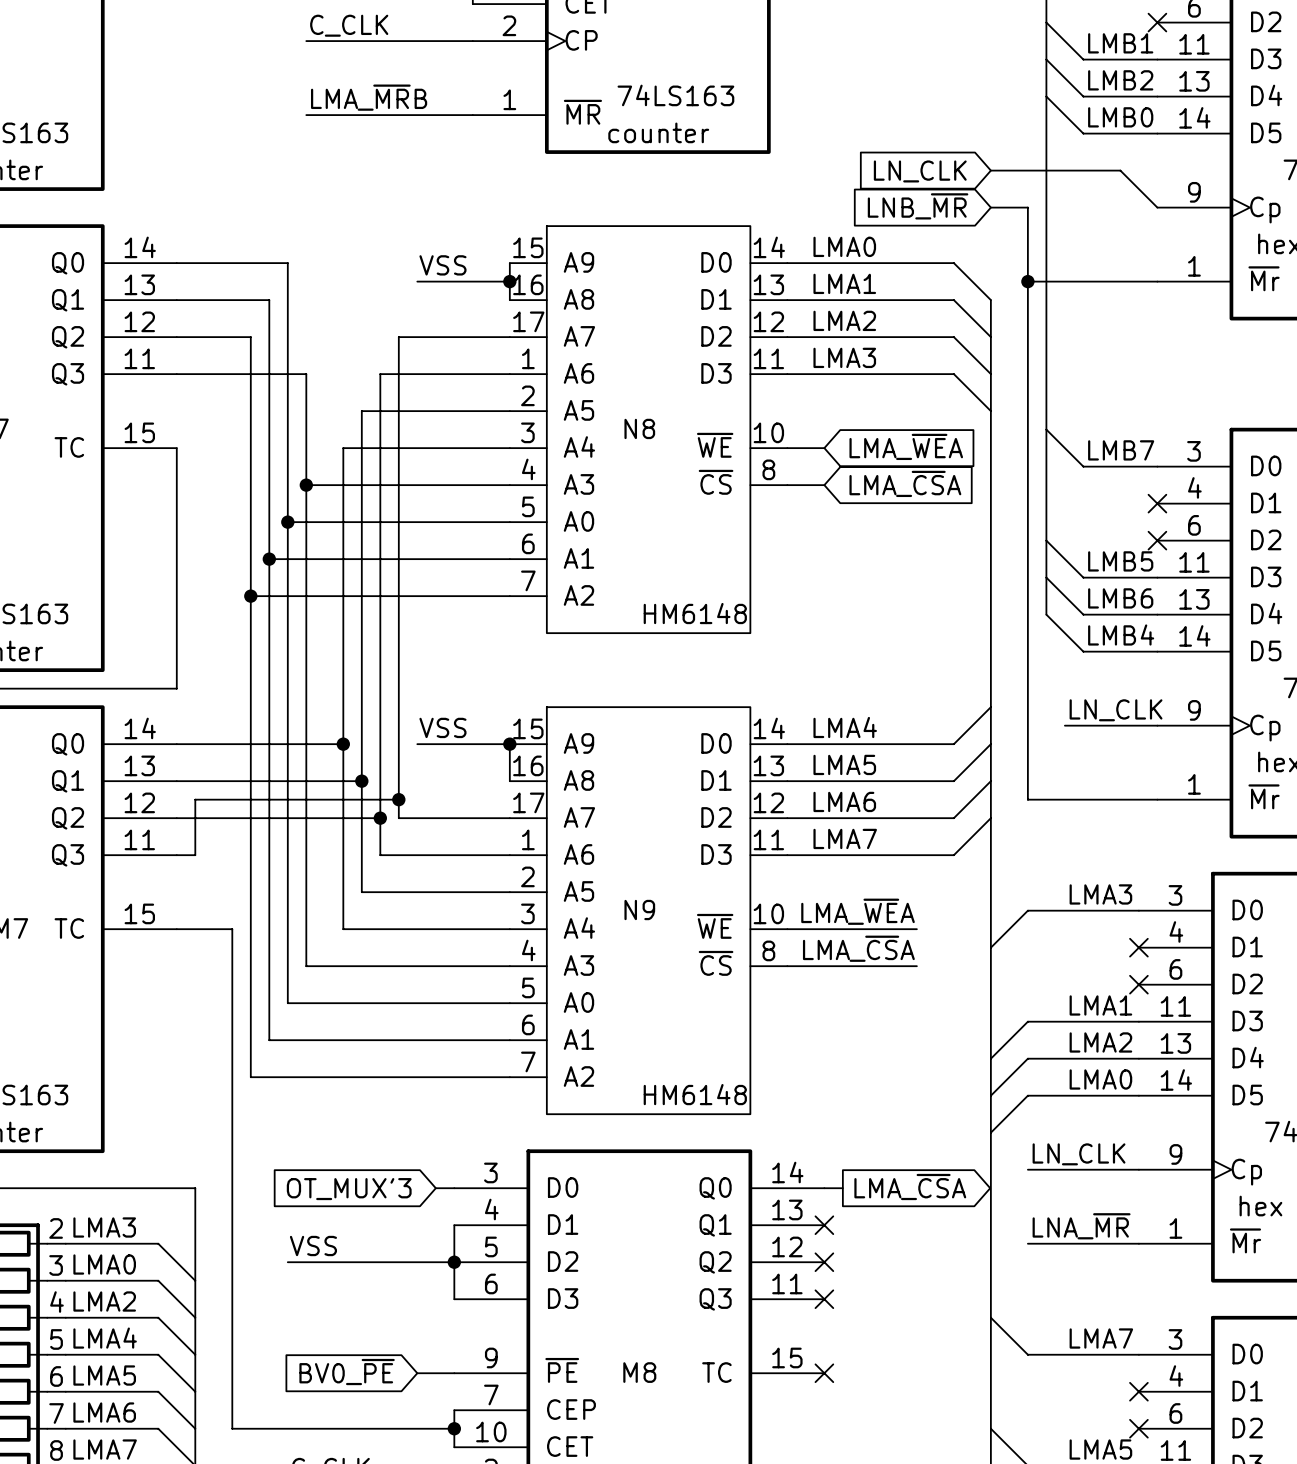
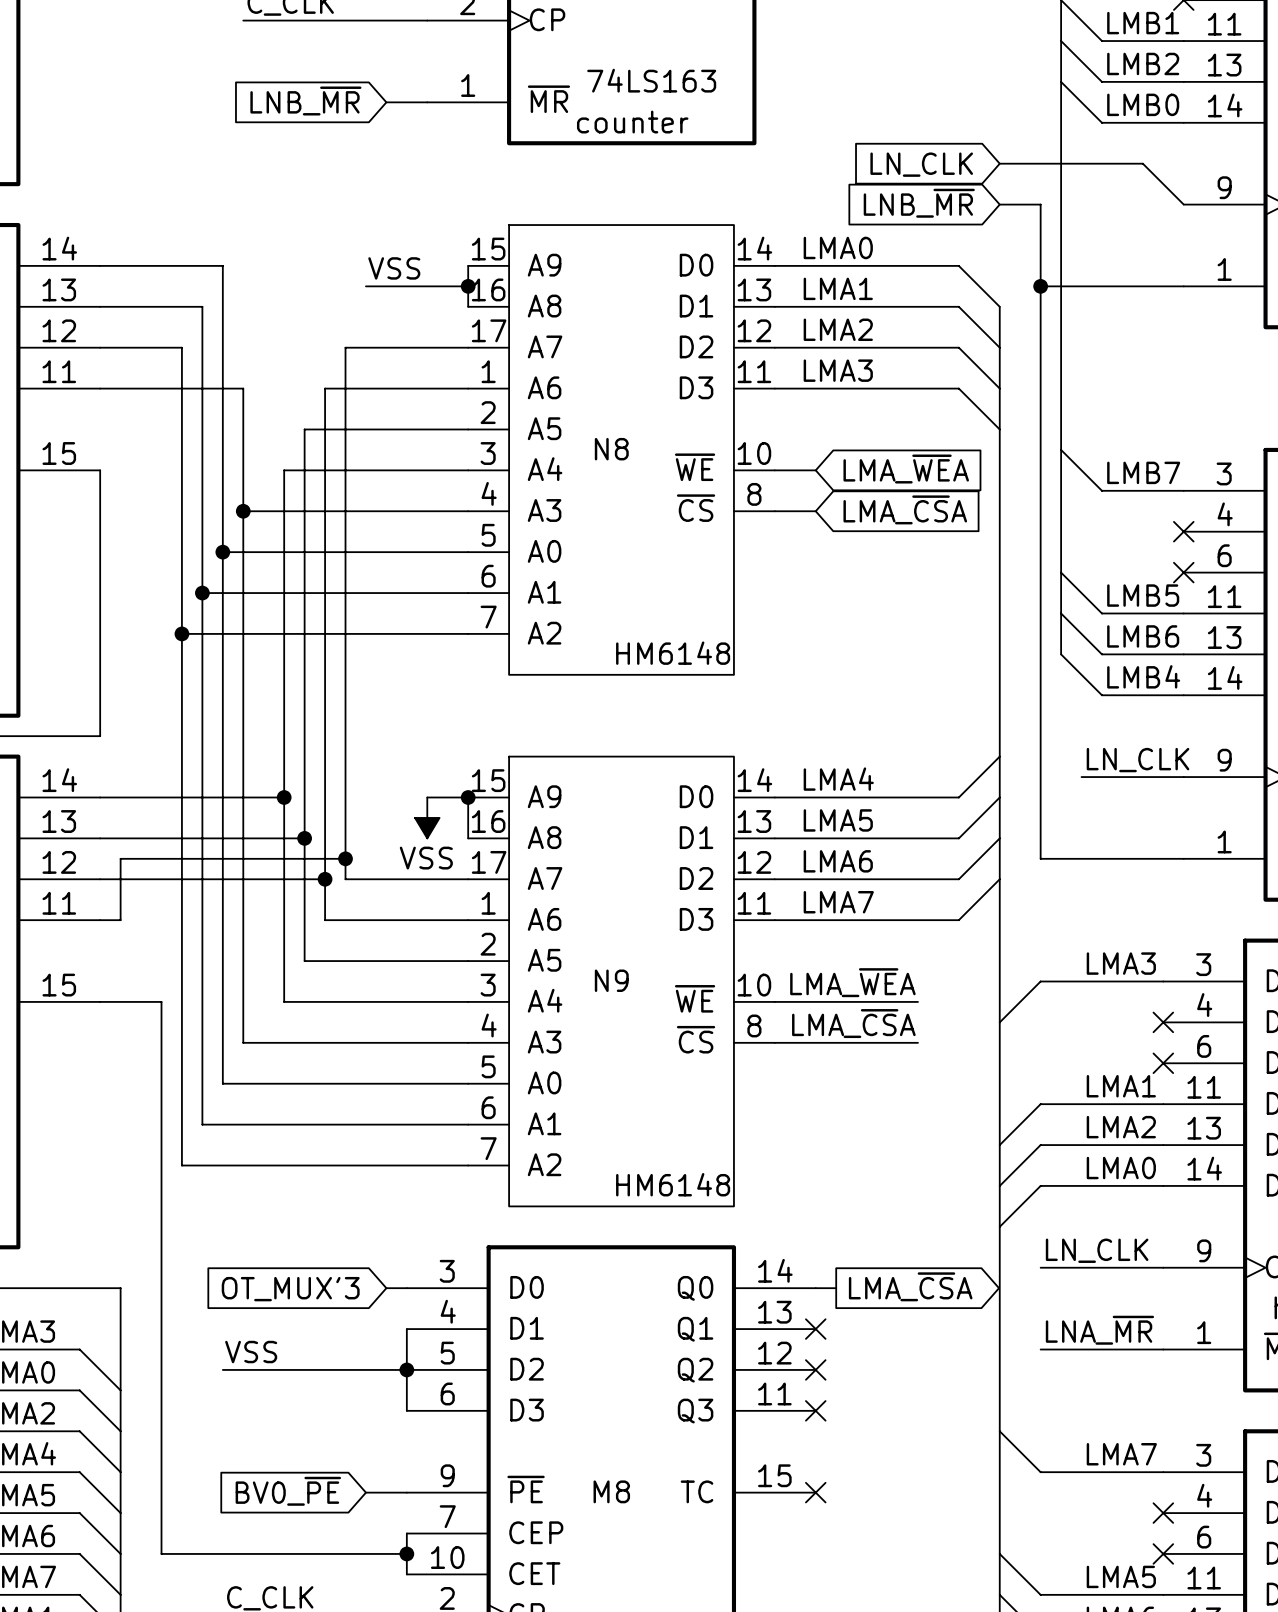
label: LMA_~{MR}B (369, 97) -> none
global label: none -> LNB_~{MR} (305, 101)
wire: (306, 115) (435, 115) -> none
label: VSS (442, 727) -> none
wire: (417, 744) (472, 744) -> none
power symbol: none -> VSS (427, 817)

